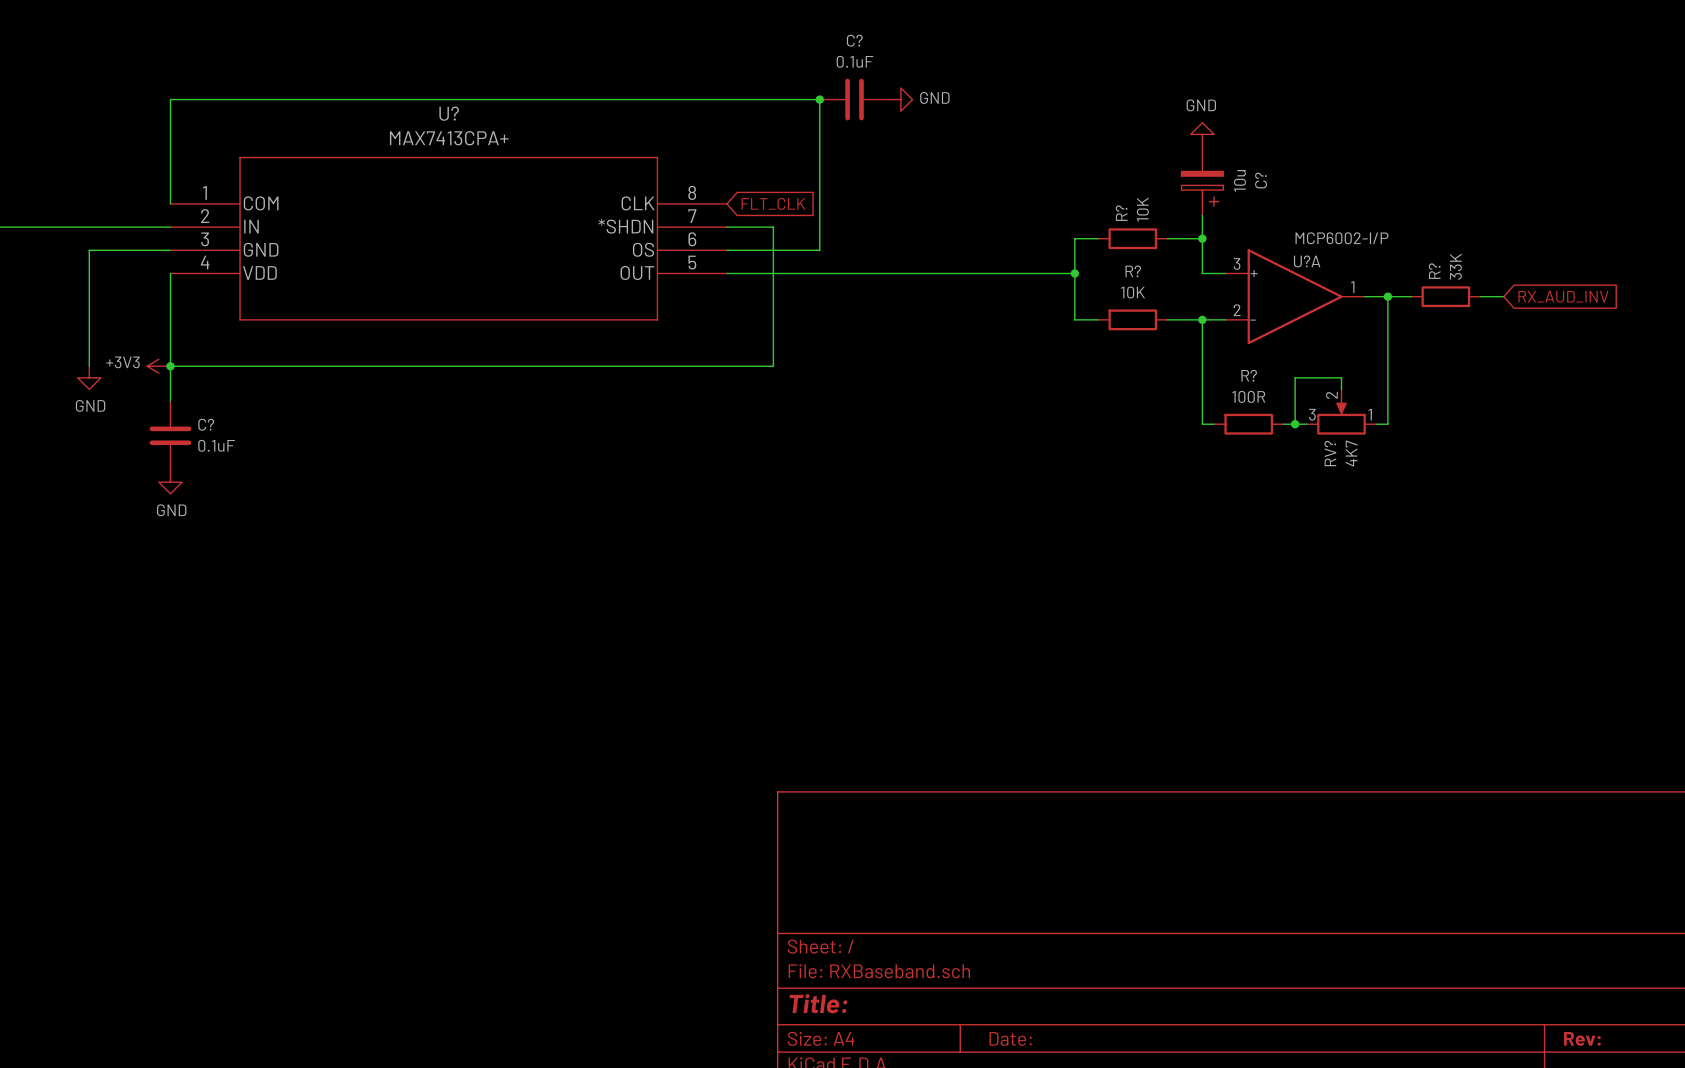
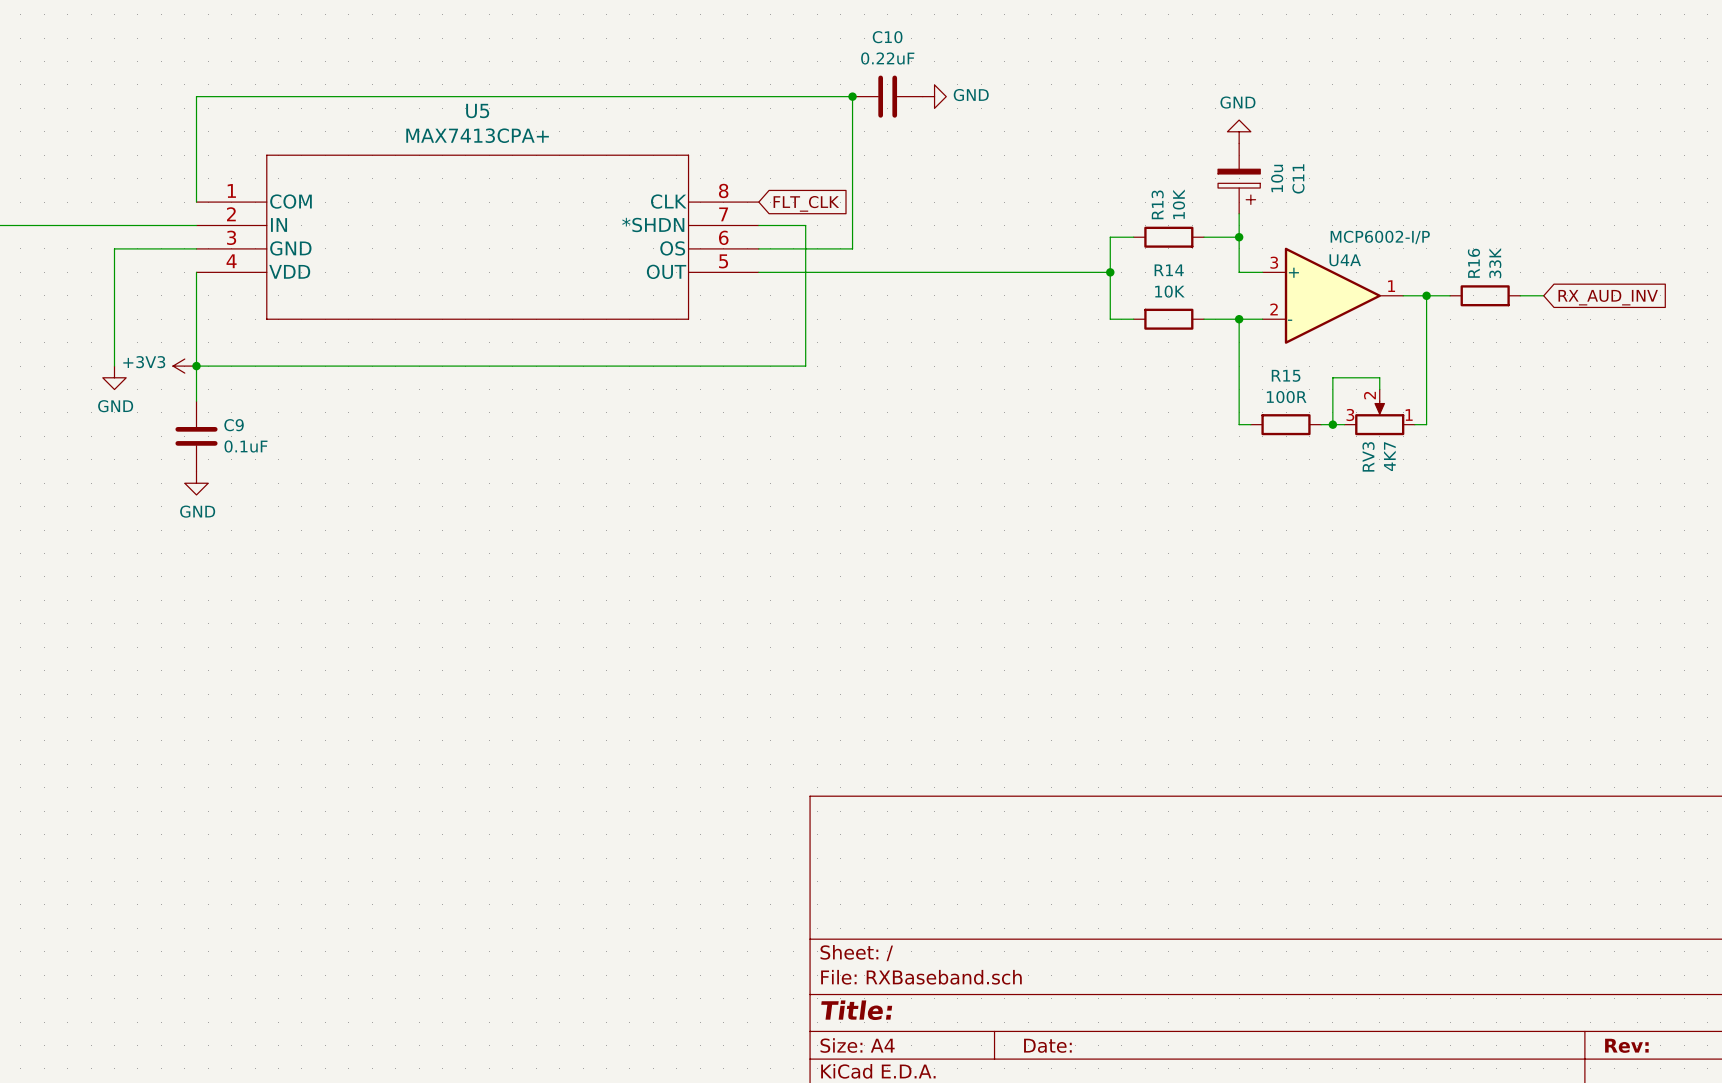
C? name: C? (854, 40) -> C10 (887, 37)
C? value: 0.1uF (854, 61) -> 0.22uF (887, 58)
U? name: U? (449, 113) -> U5 (477, 111)
C? name: C? (1261, 180) -> C11 (1298, 178)
R? name: R? (1121, 213) -> R13 (1157, 204)
U?A name: U?A (1307, 261) -> U4A (1345, 260)
R? name: R? (1133, 271) -> R14 (1169, 270)
R? name: R? (1434, 271) -> R16 (1473, 263)
R? name: R? (1249, 375) -> R15 (1286, 375)
C? name: C? (206, 424) -> C9 (234, 425)
RV? name: RV? (1330, 453) -> RV3 (1368, 456)

